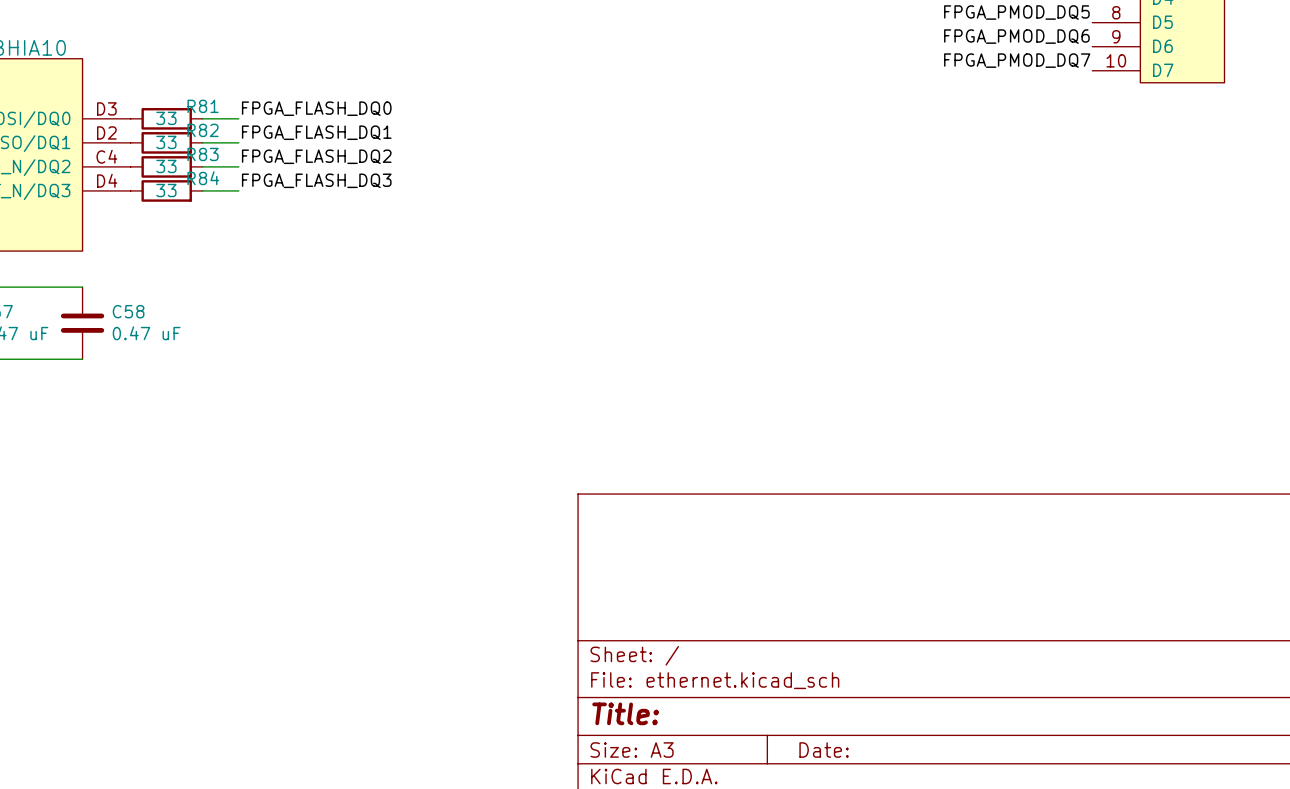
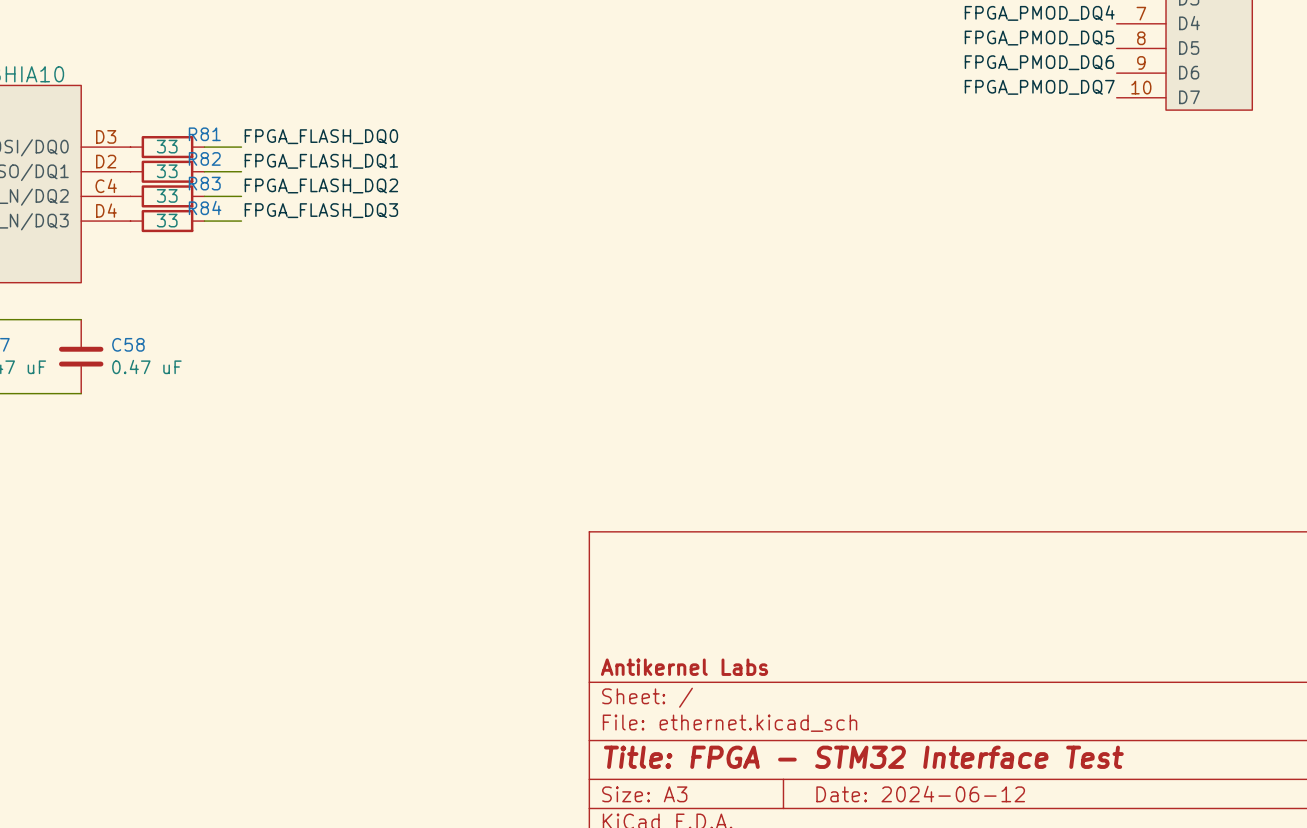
title block: none -> Antikernel Labs (684, 667)
title block: Title: (625, 713) -> Title: FPGA - STM32 Interface Test (863, 757)
title block: Date: (824, 750) -> Date: 2024-06-12 (920, 794)

